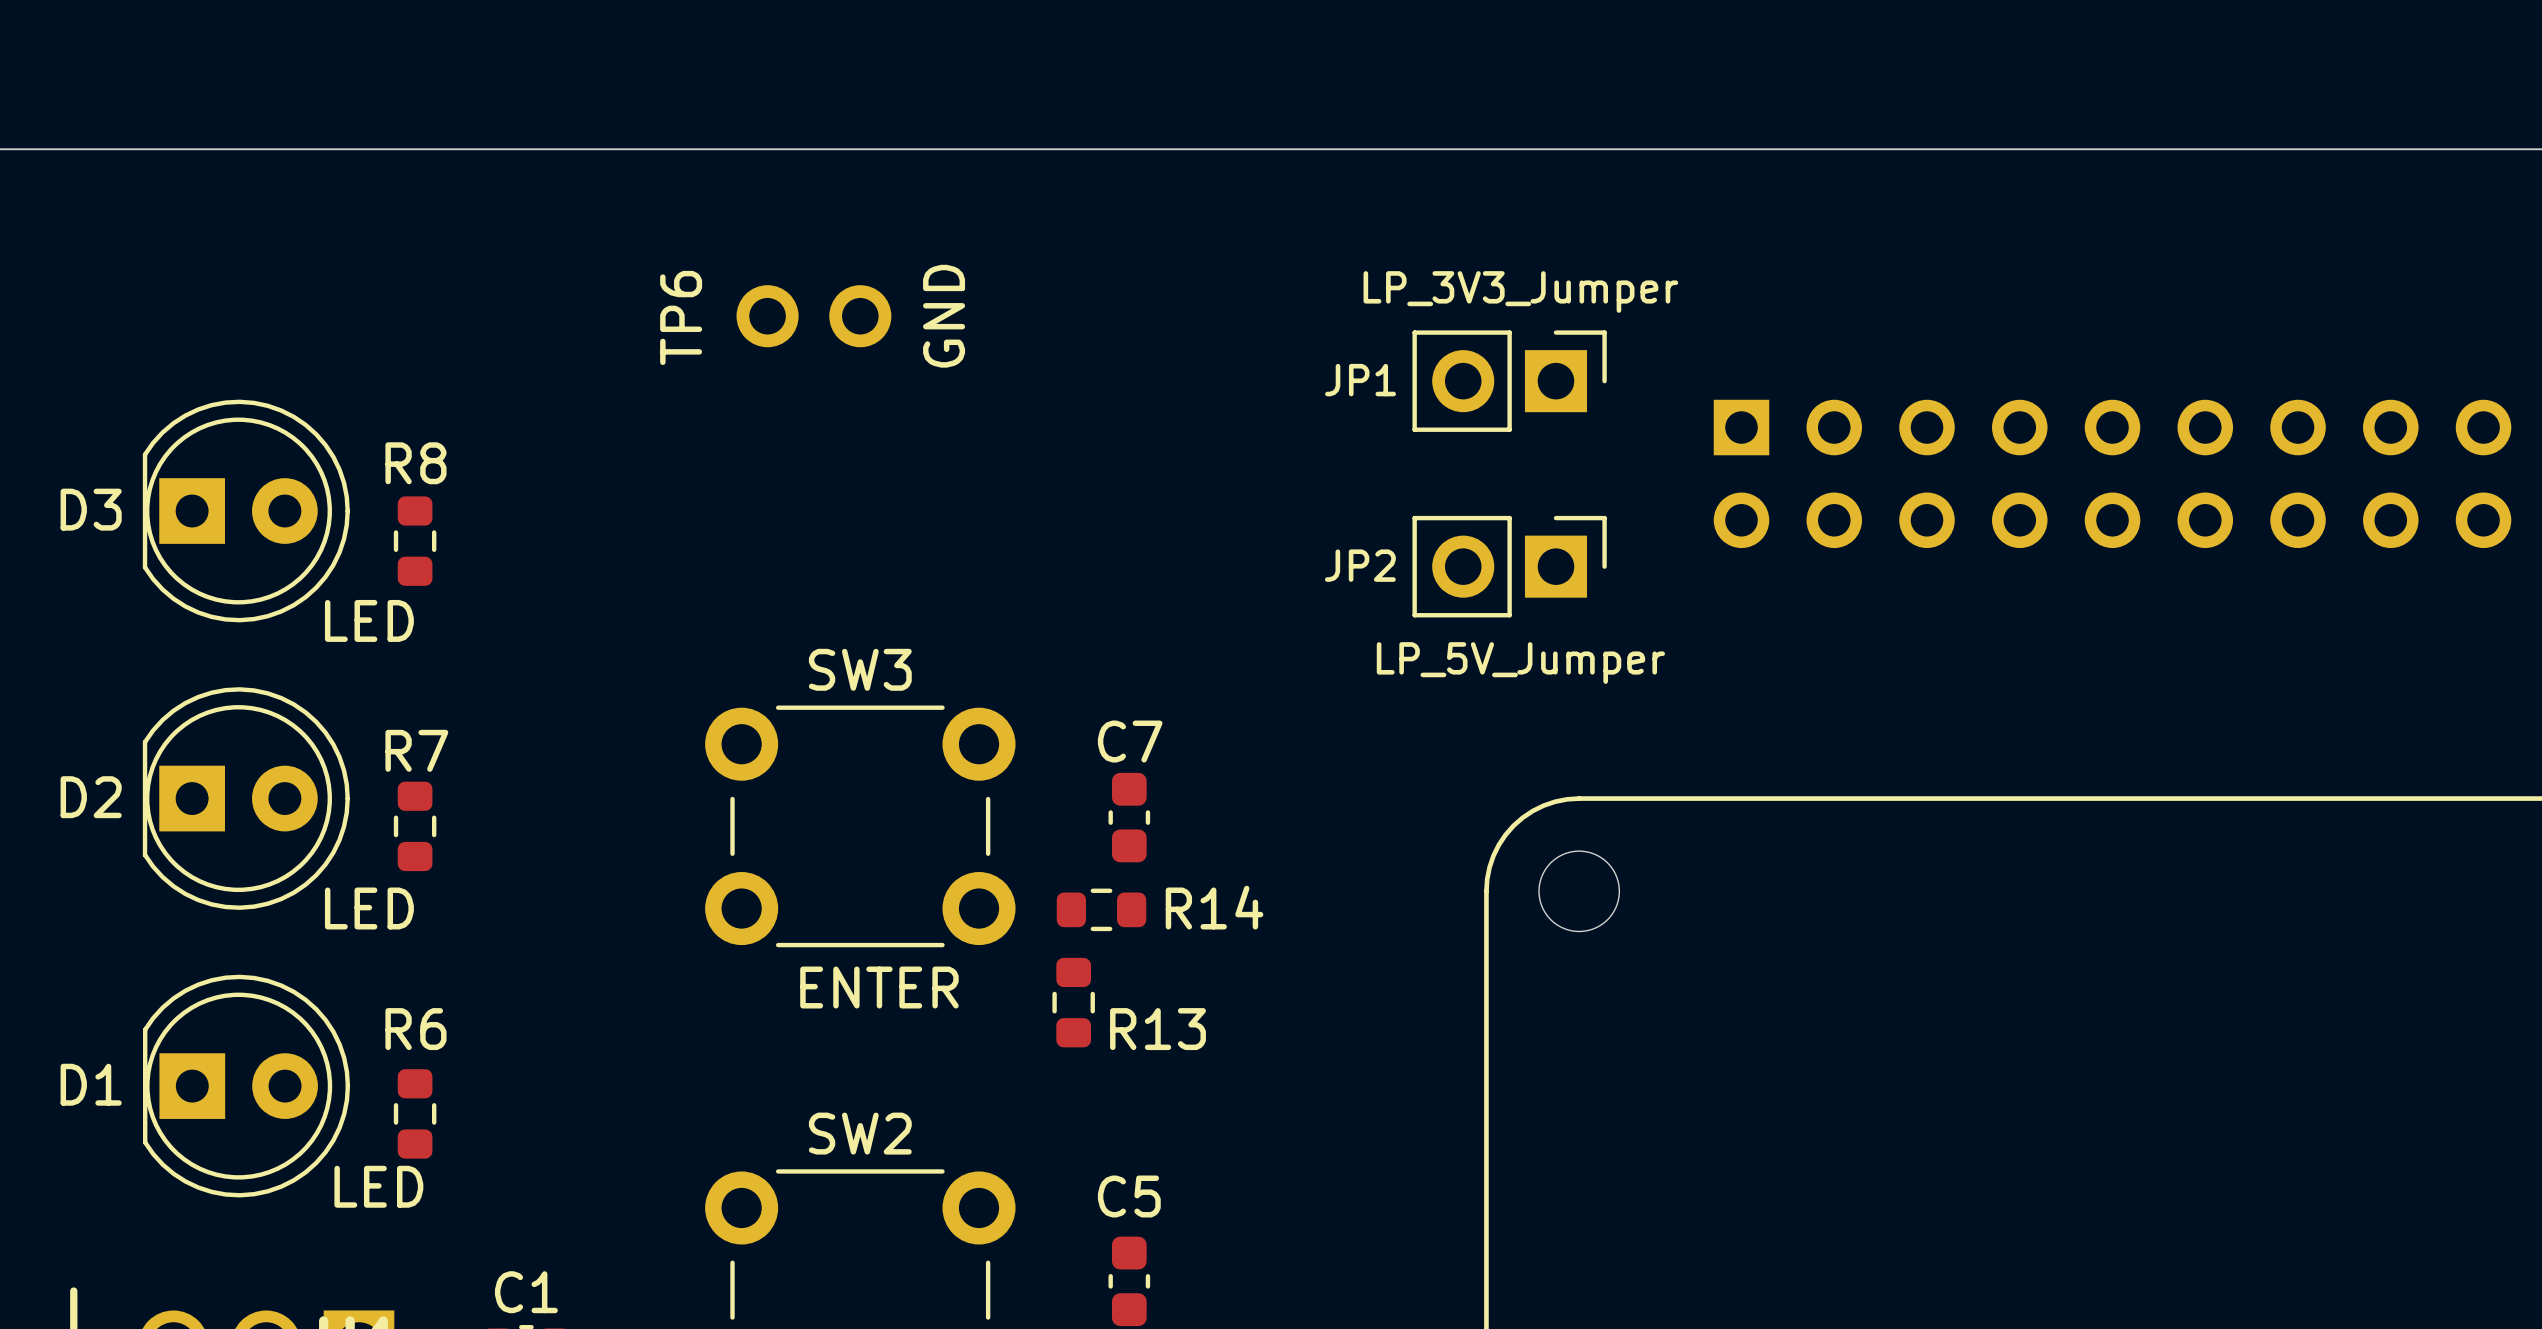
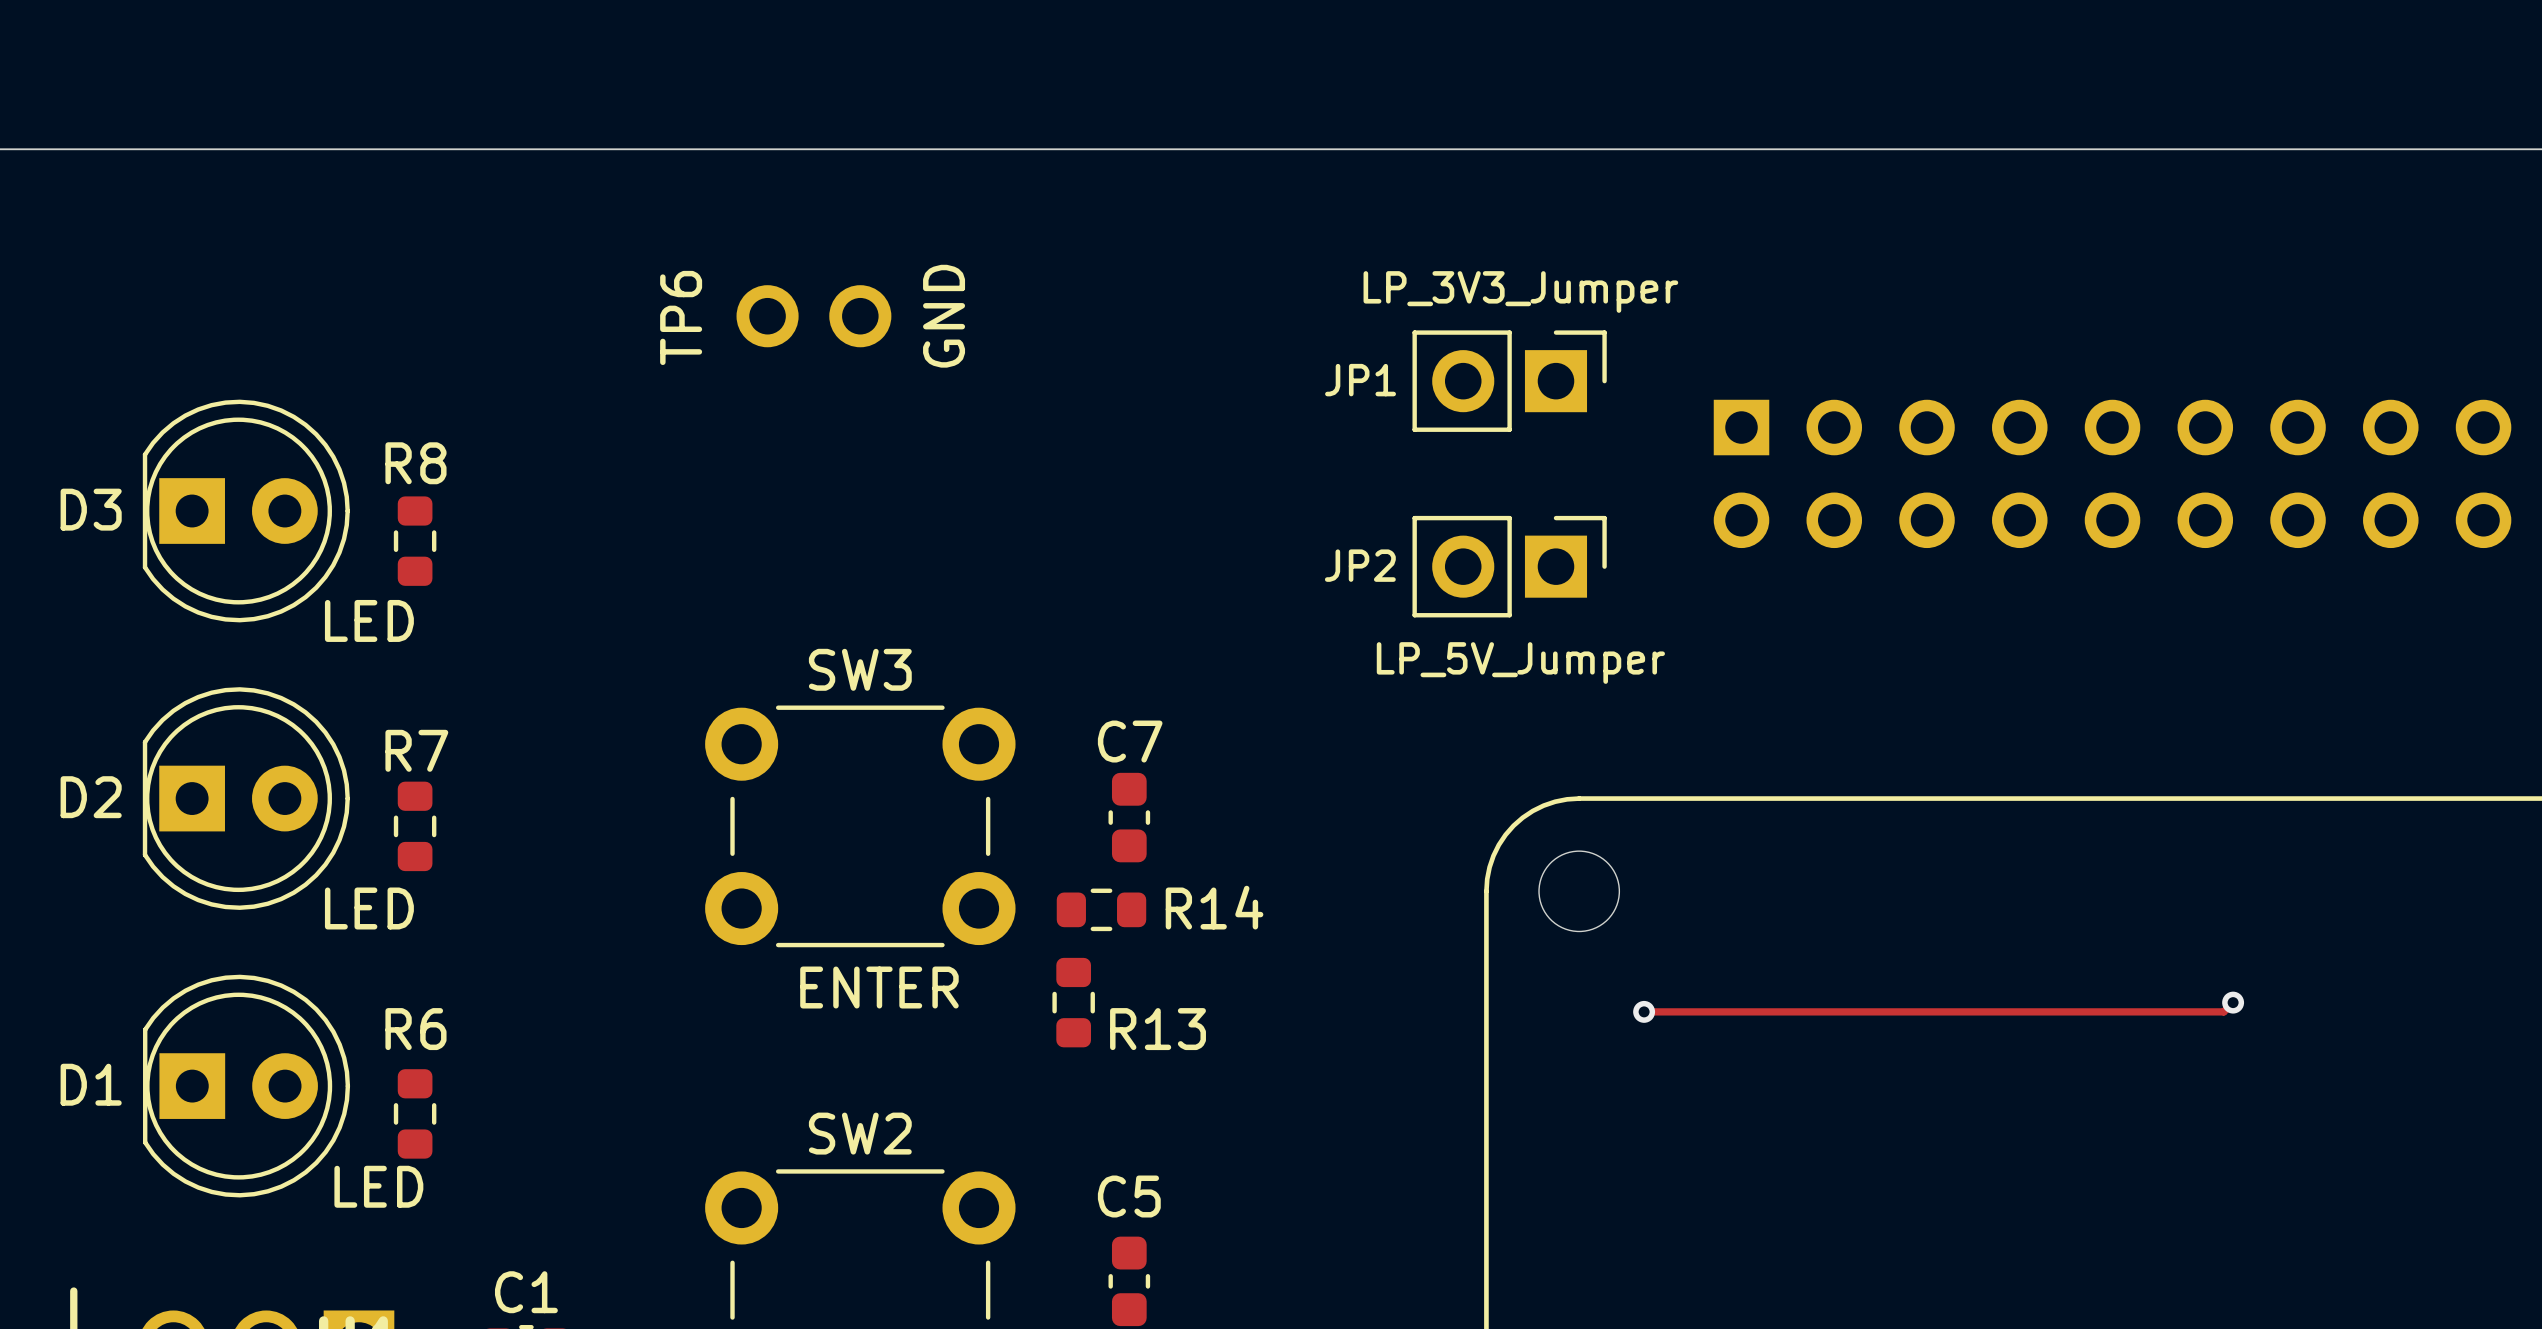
track: none -> (2233, 1002) (2223, 1011) (1644, 1011)
via: none -> (2233, 1002)
via: none -> (1644, 1011)

